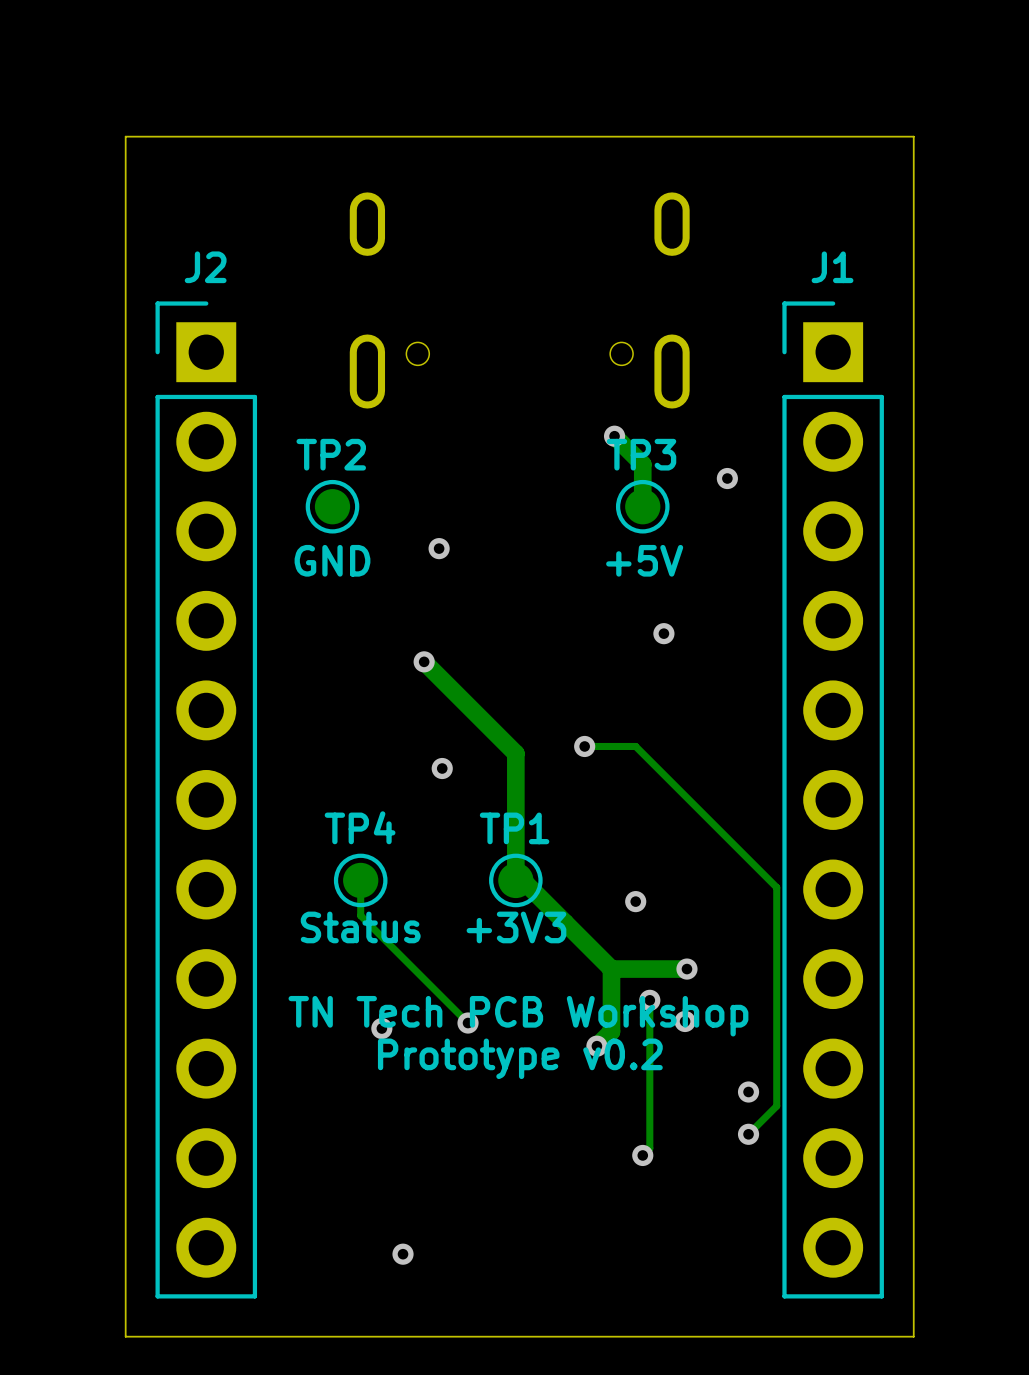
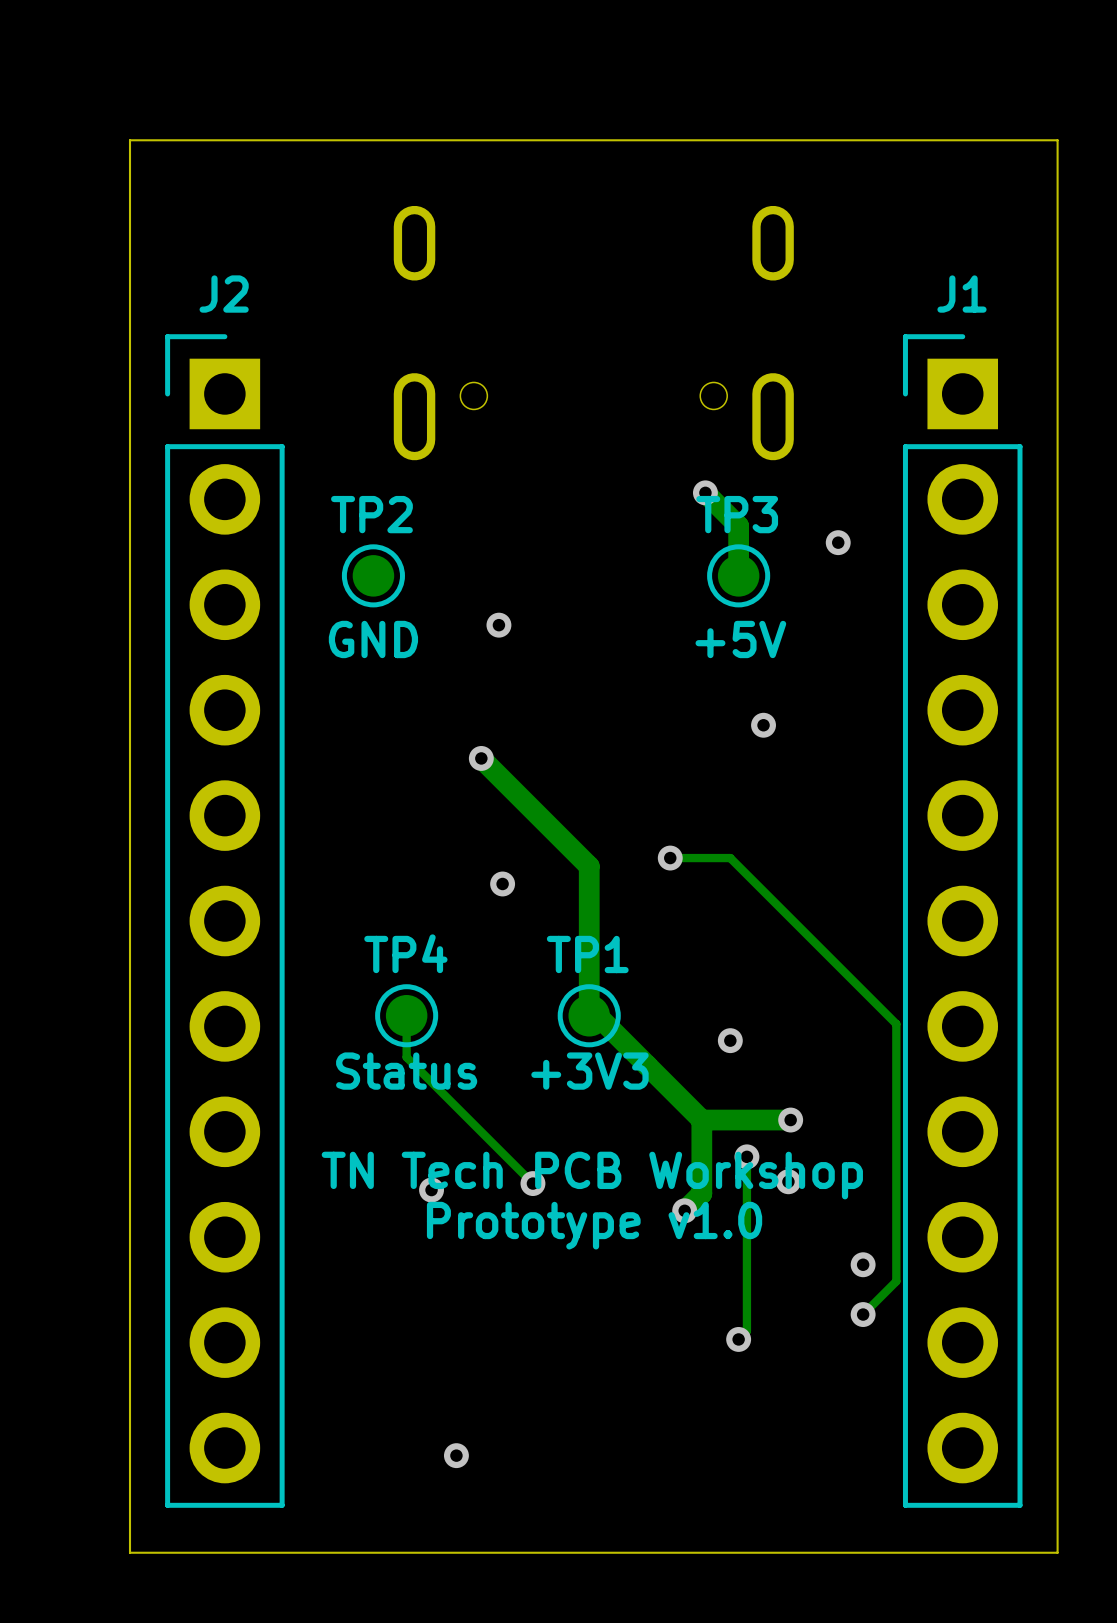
text: Prototype v0.2 (520, 1058) -> Prototype v1.0 (594, 1225)

